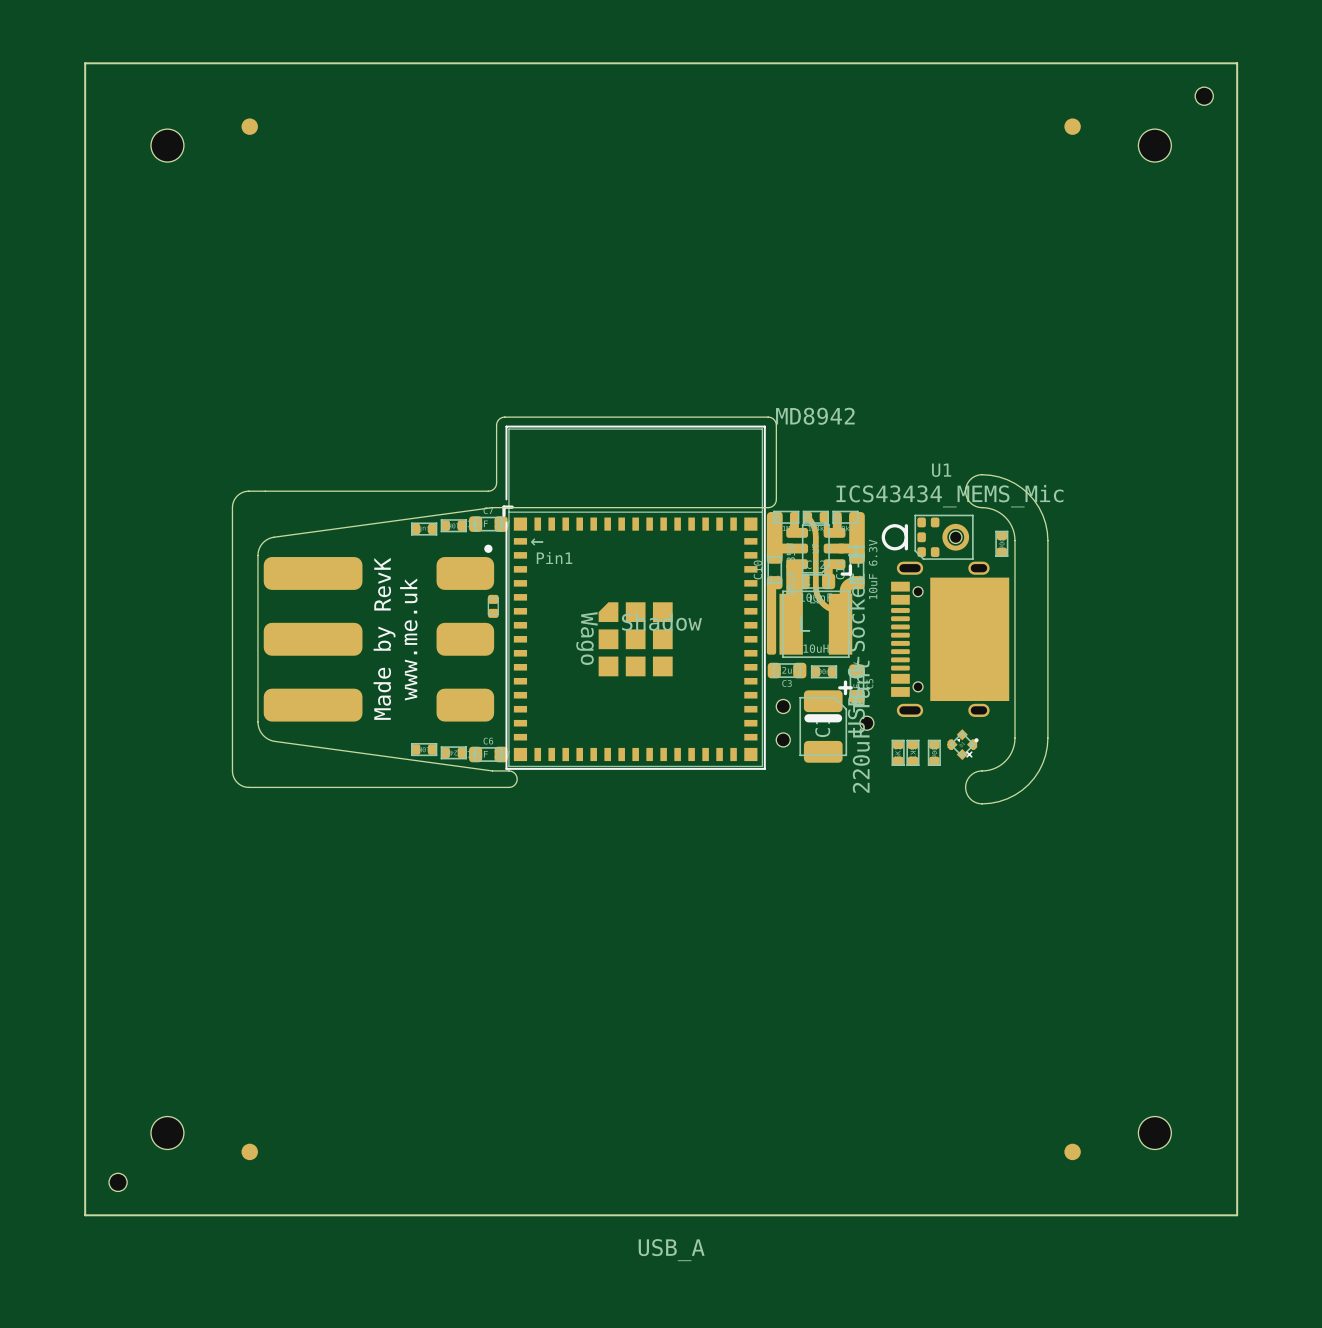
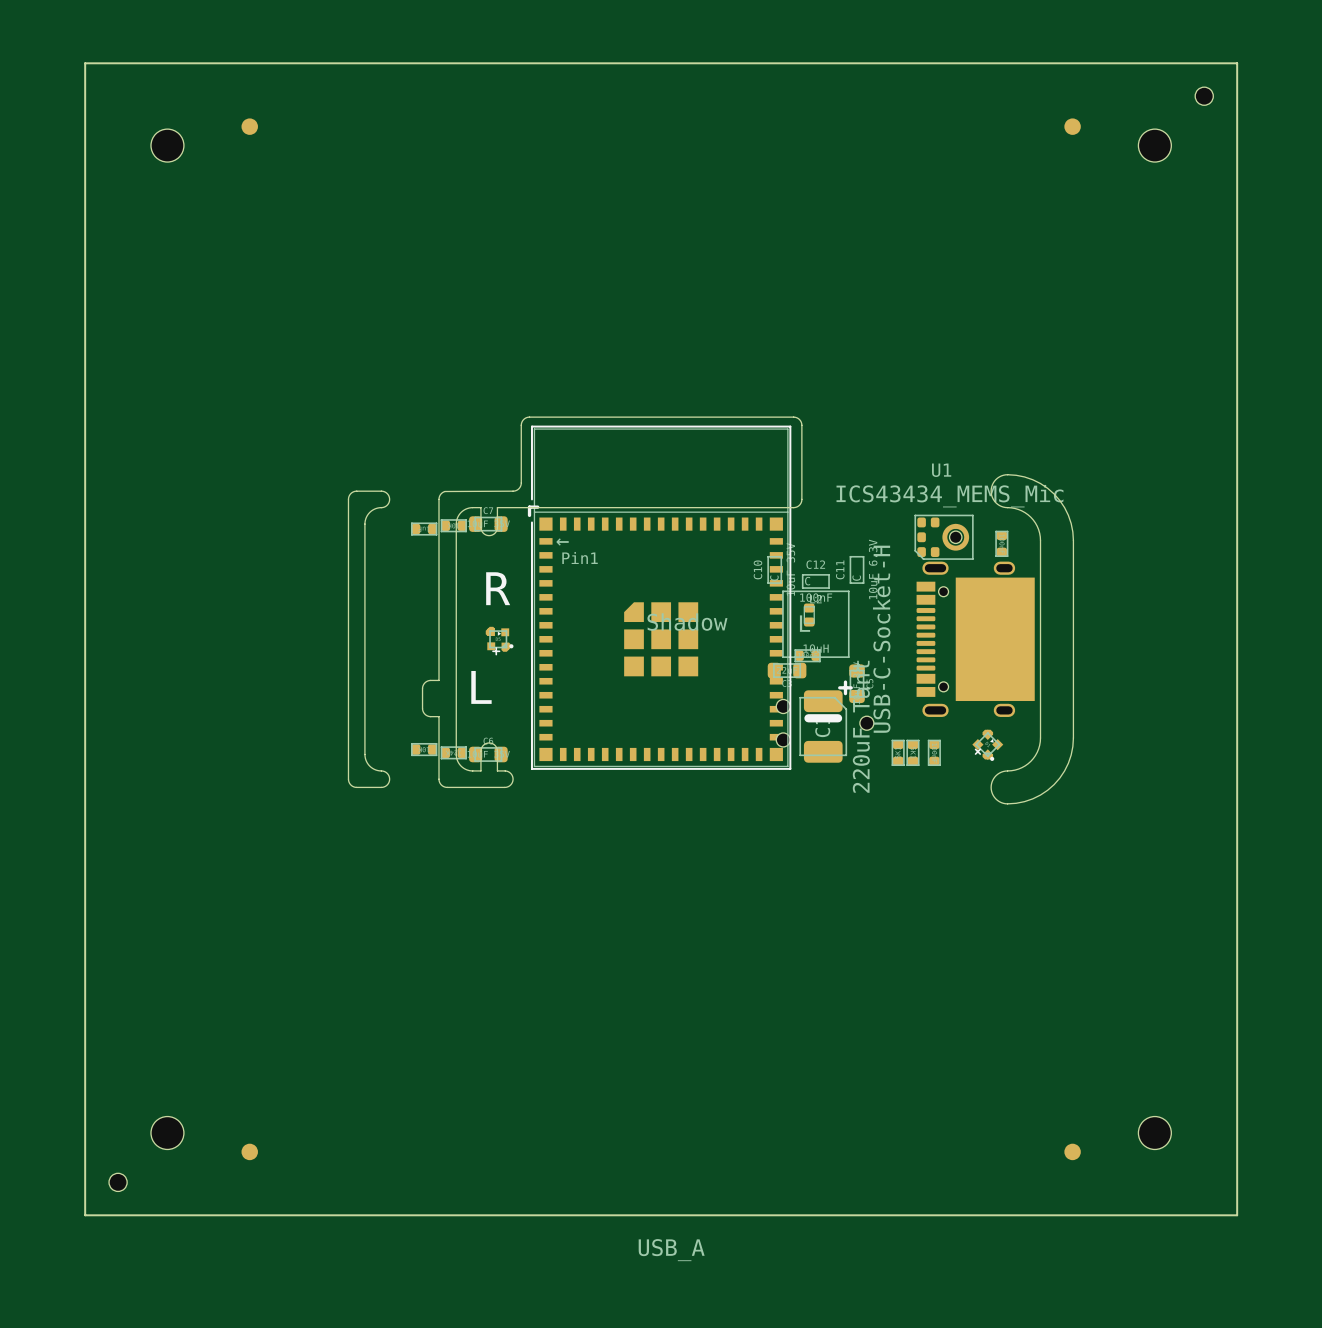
board edge: (529, 417) (503, 417) (497, 421) (496, 484) (492, 490) (381, 491) -> (529, 417) (524, 418) (521, 424) (521, 482) (518, 488) (513, 491) (444, 491) (439, 496) (438, 680) (427, 681) (422, 687) (423, 712) (428, 716) (438, 716) (438, 779) (441, 785) (447, 787) (506, 787) (511, 784) (513, 778) (510, 773) (505, 770)
board edge: (768, 417) (773, 419) (776, 425) (776, 500) (773, 505) (768, 507) -> (768, 417) (795, 417) (800, 420) (801, 425) (801, 502) (794, 507) (768, 507)
board edge: (982, 474) (973, 476) (967, 482) (965, 491) (967, 499) (975, 506) (992, 509) (1002, 514) (1011, 526) (1014, 540) (1014, 741) (1011, 752) (1002, 763) (992, 769) (975, 772) (967, 779) (965, 787) (967, 795) (973, 801) (982, 803) (1007, 798) (1028, 784) (1042, 763) (1047, 738) (1047, 540) (1045, 523) (1034, 500) (1022, 488) (999, 476) (982, 474) -> (1007, 474) (999, 476) (993, 482) (991, 491) (993, 499) (1001, 506) (1018, 509) (1028, 514) (1037, 526) (1040, 540) (1040, 741) (1035, 755) (1028, 763) (1018, 769) (1001, 772) (993, 779) (991, 787) (993, 795) (999, 801) (1007, 803) (1032, 798) (1054, 784) (1068, 763) (1073, 738) (1073, 540) (1071, 523) (1064, 507) (1047, 488) (1032, 479) (1007, 474)
board edge: (356, 491) (247, 491) (237, 496) (232, 507) (233, 777) (238, 784) (246, 787) (356, 787) -> (356, 491) (350, 493) (348, 499) (348, 779) (350, 785) (356, 787)
board edge: (497, 507) (271, 537) (262, 543) (257, 555) (257, 721) (259, 728) (264, 736) (274, 741) (497, 770) -> (497, 507) (497, 529) (492, 535) (486, 535) (481, 530) (480, 507) (463, 510) (458, 515) (456, 524) (456, 756) (458, 763) (463, 768) (480, 770) (481, 748) (486, 743) (492, 743) (497, 750) (497, 770)
drawing: [773, 510, 859, 524] -> none
drawing: [881, 524, 909, 551] -> none
line: (906, 525) (906, 548) -> none
part: MD8942 (815, 583) -> none
text: none -> R (498, 588)
part position: (634, 597) -> (659, 597)
part position: (493, 606) -> (809, 615)
drawing position: (661, 622) -> (687, 622)
part: Wago (378, 633) -> none
text: Made by RevK (384, 638) -> none
text: www.me.uk (408, 639) -> none
part position: (950, 639) -> (975, 639)
part: none -> (499, 641)
part position: (824, 671) -> (807, 655)
text: none -> L (481, 687)
part rotation: 0° (963, 744) -> 90° clockwise (987, 745)
part position: (963, 744) -> (987, 745)
board edge: (505, 770) (512, 771) (516, 776) (516, 782) (512, 786) (381, 787) -> (381, 491) (388, 495) (388, 503) (384, 507) (371, 511) (366, 516) (364, 524) (365, 756) (371, 767) (384, 771) (388, 775) (388, 783) (381, 787)

